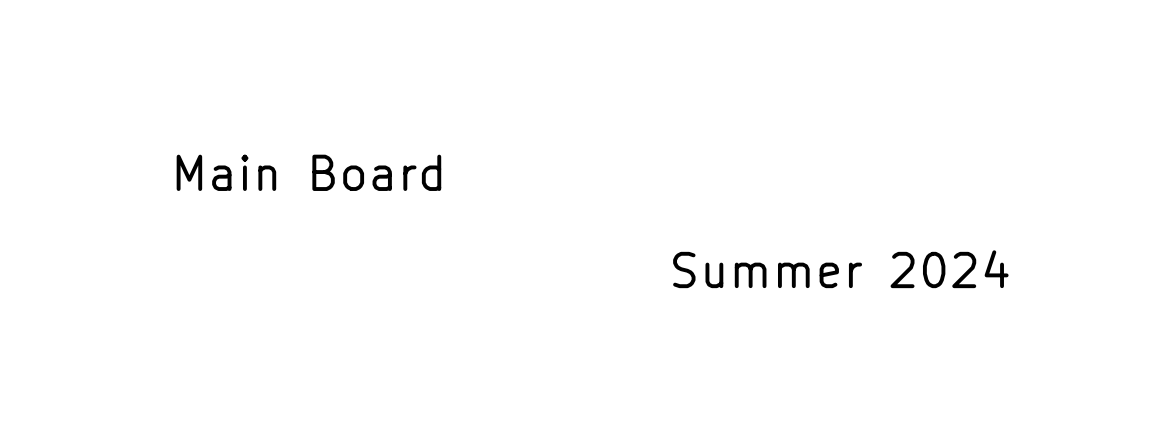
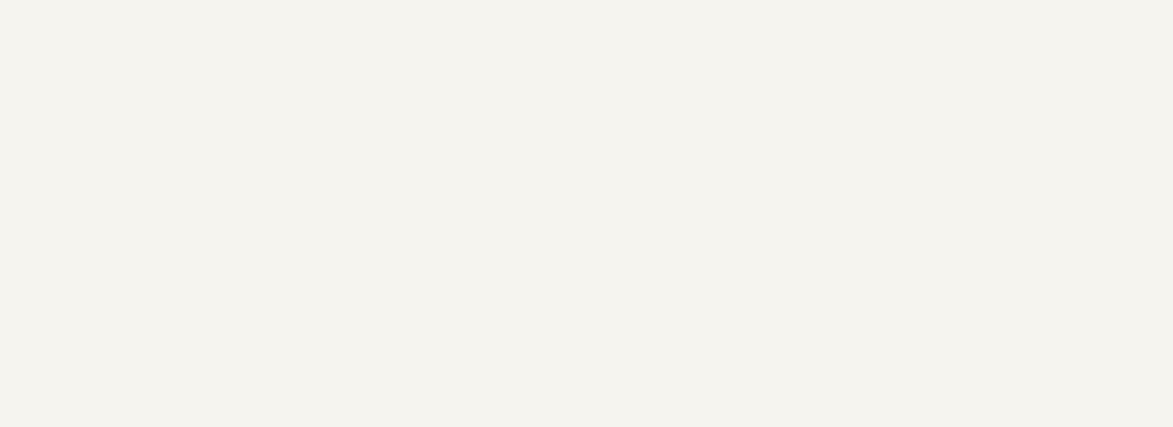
text: Main Board (308, 172) -> none
text: Summer 2024 (840, 269) -> none

